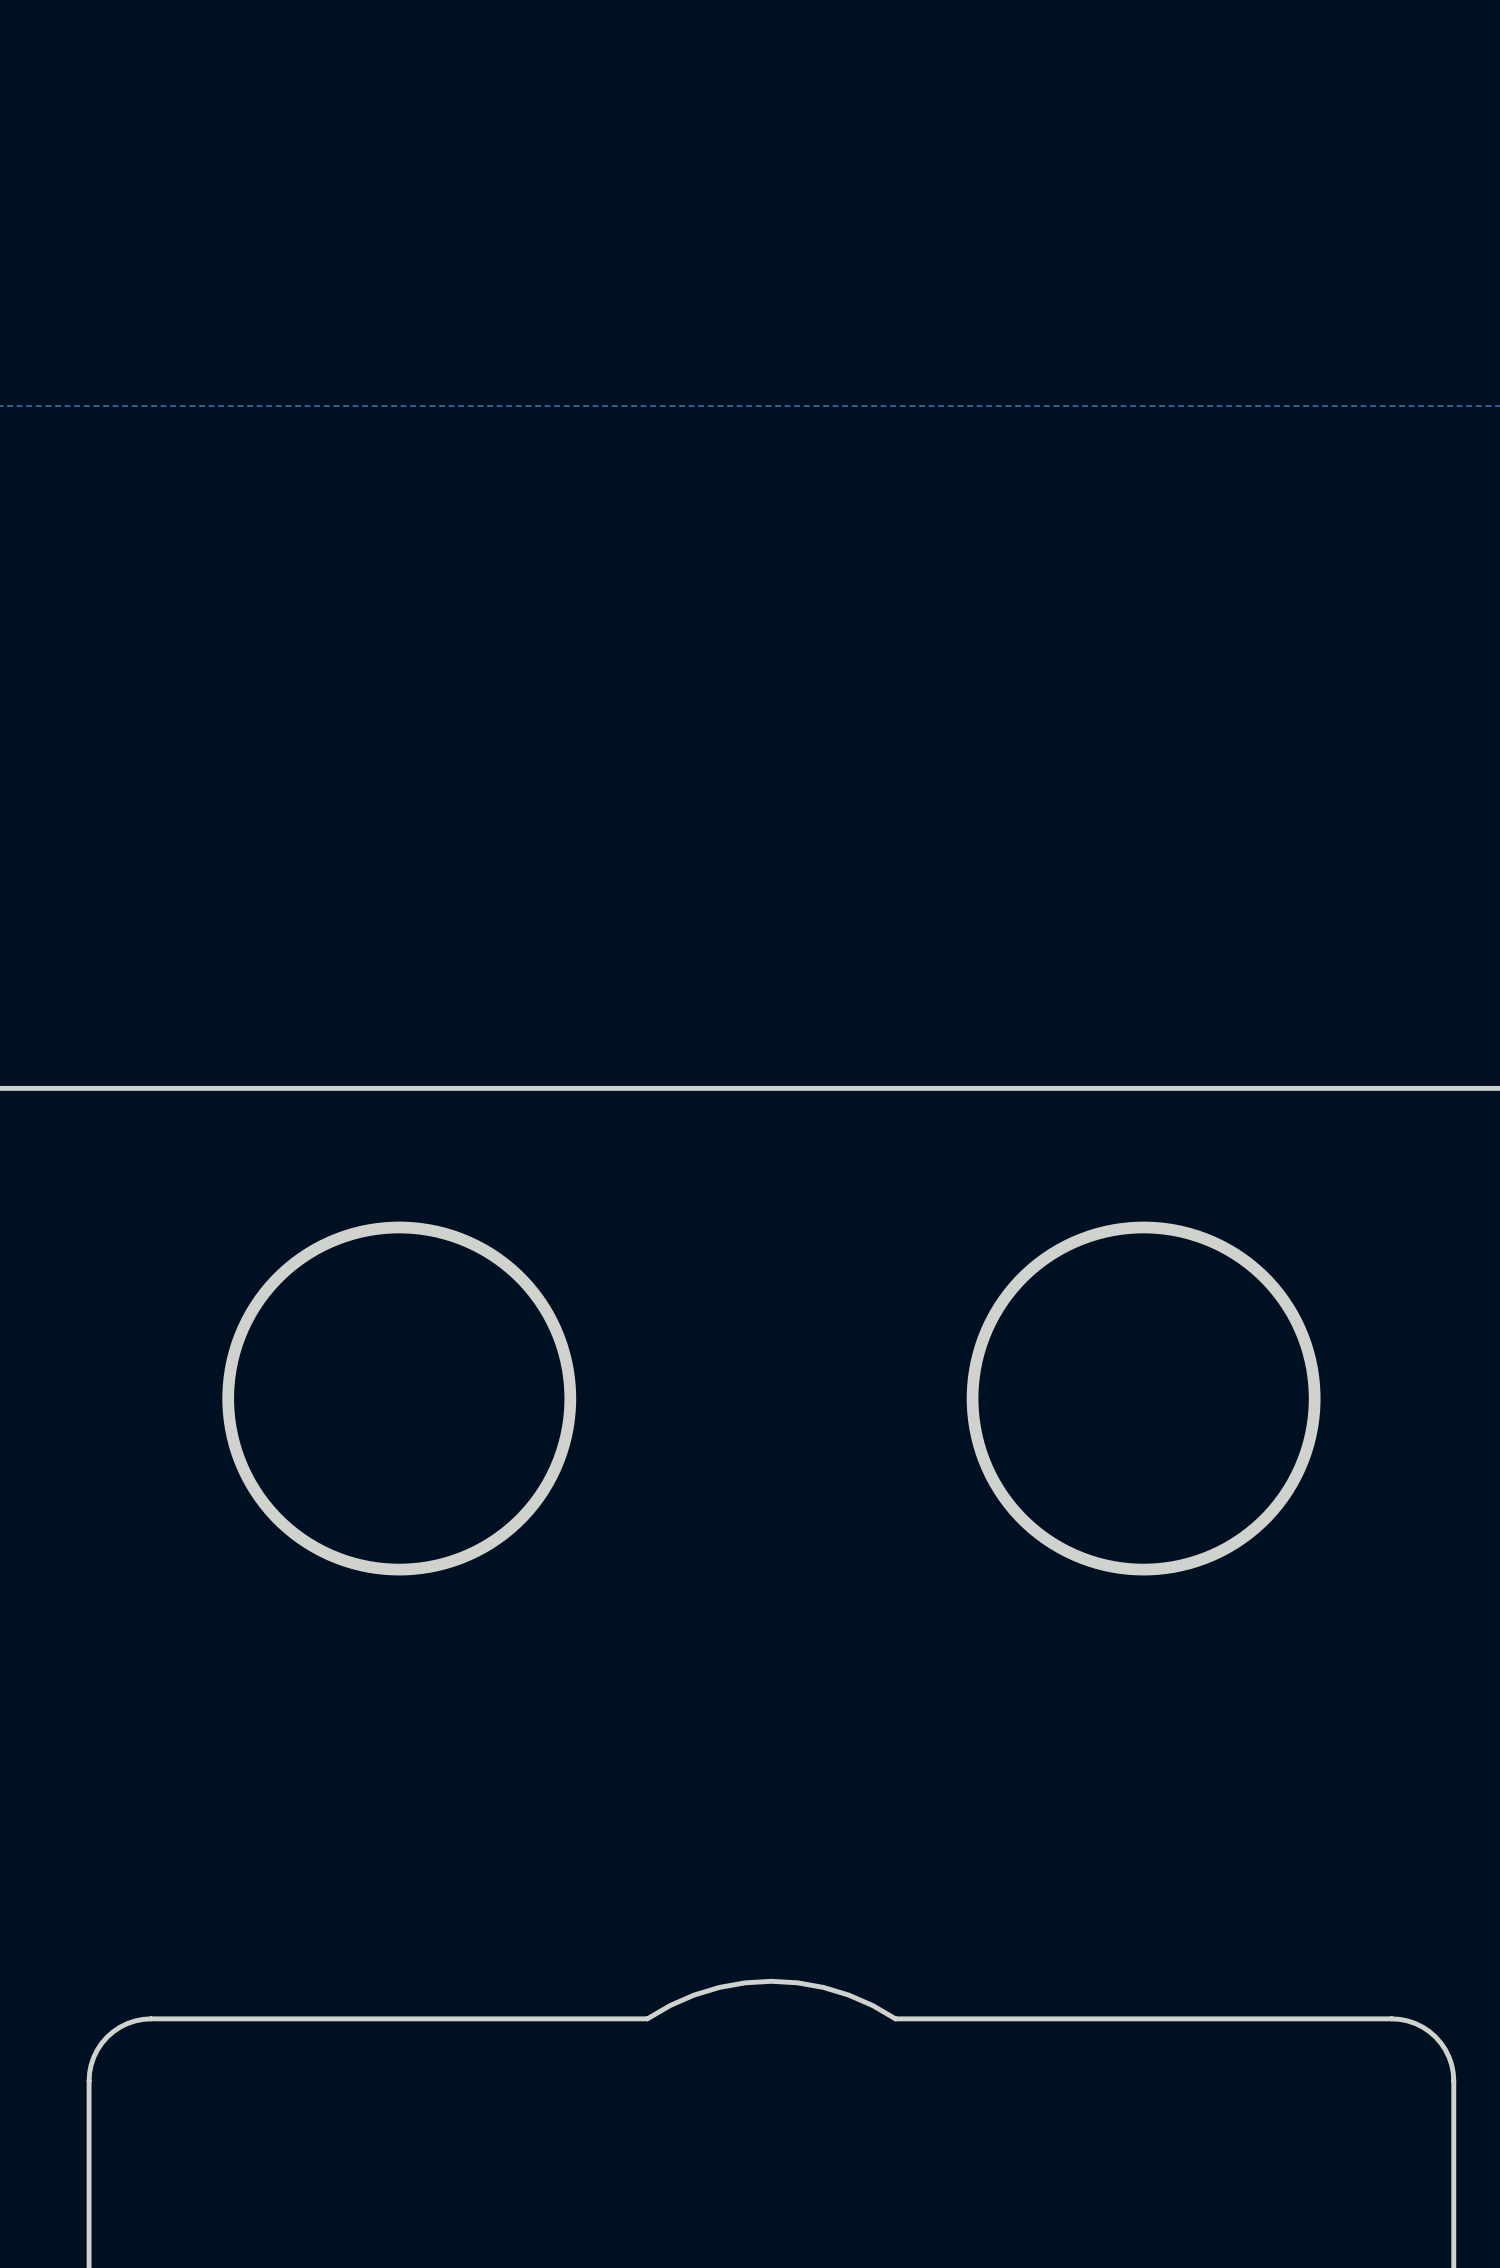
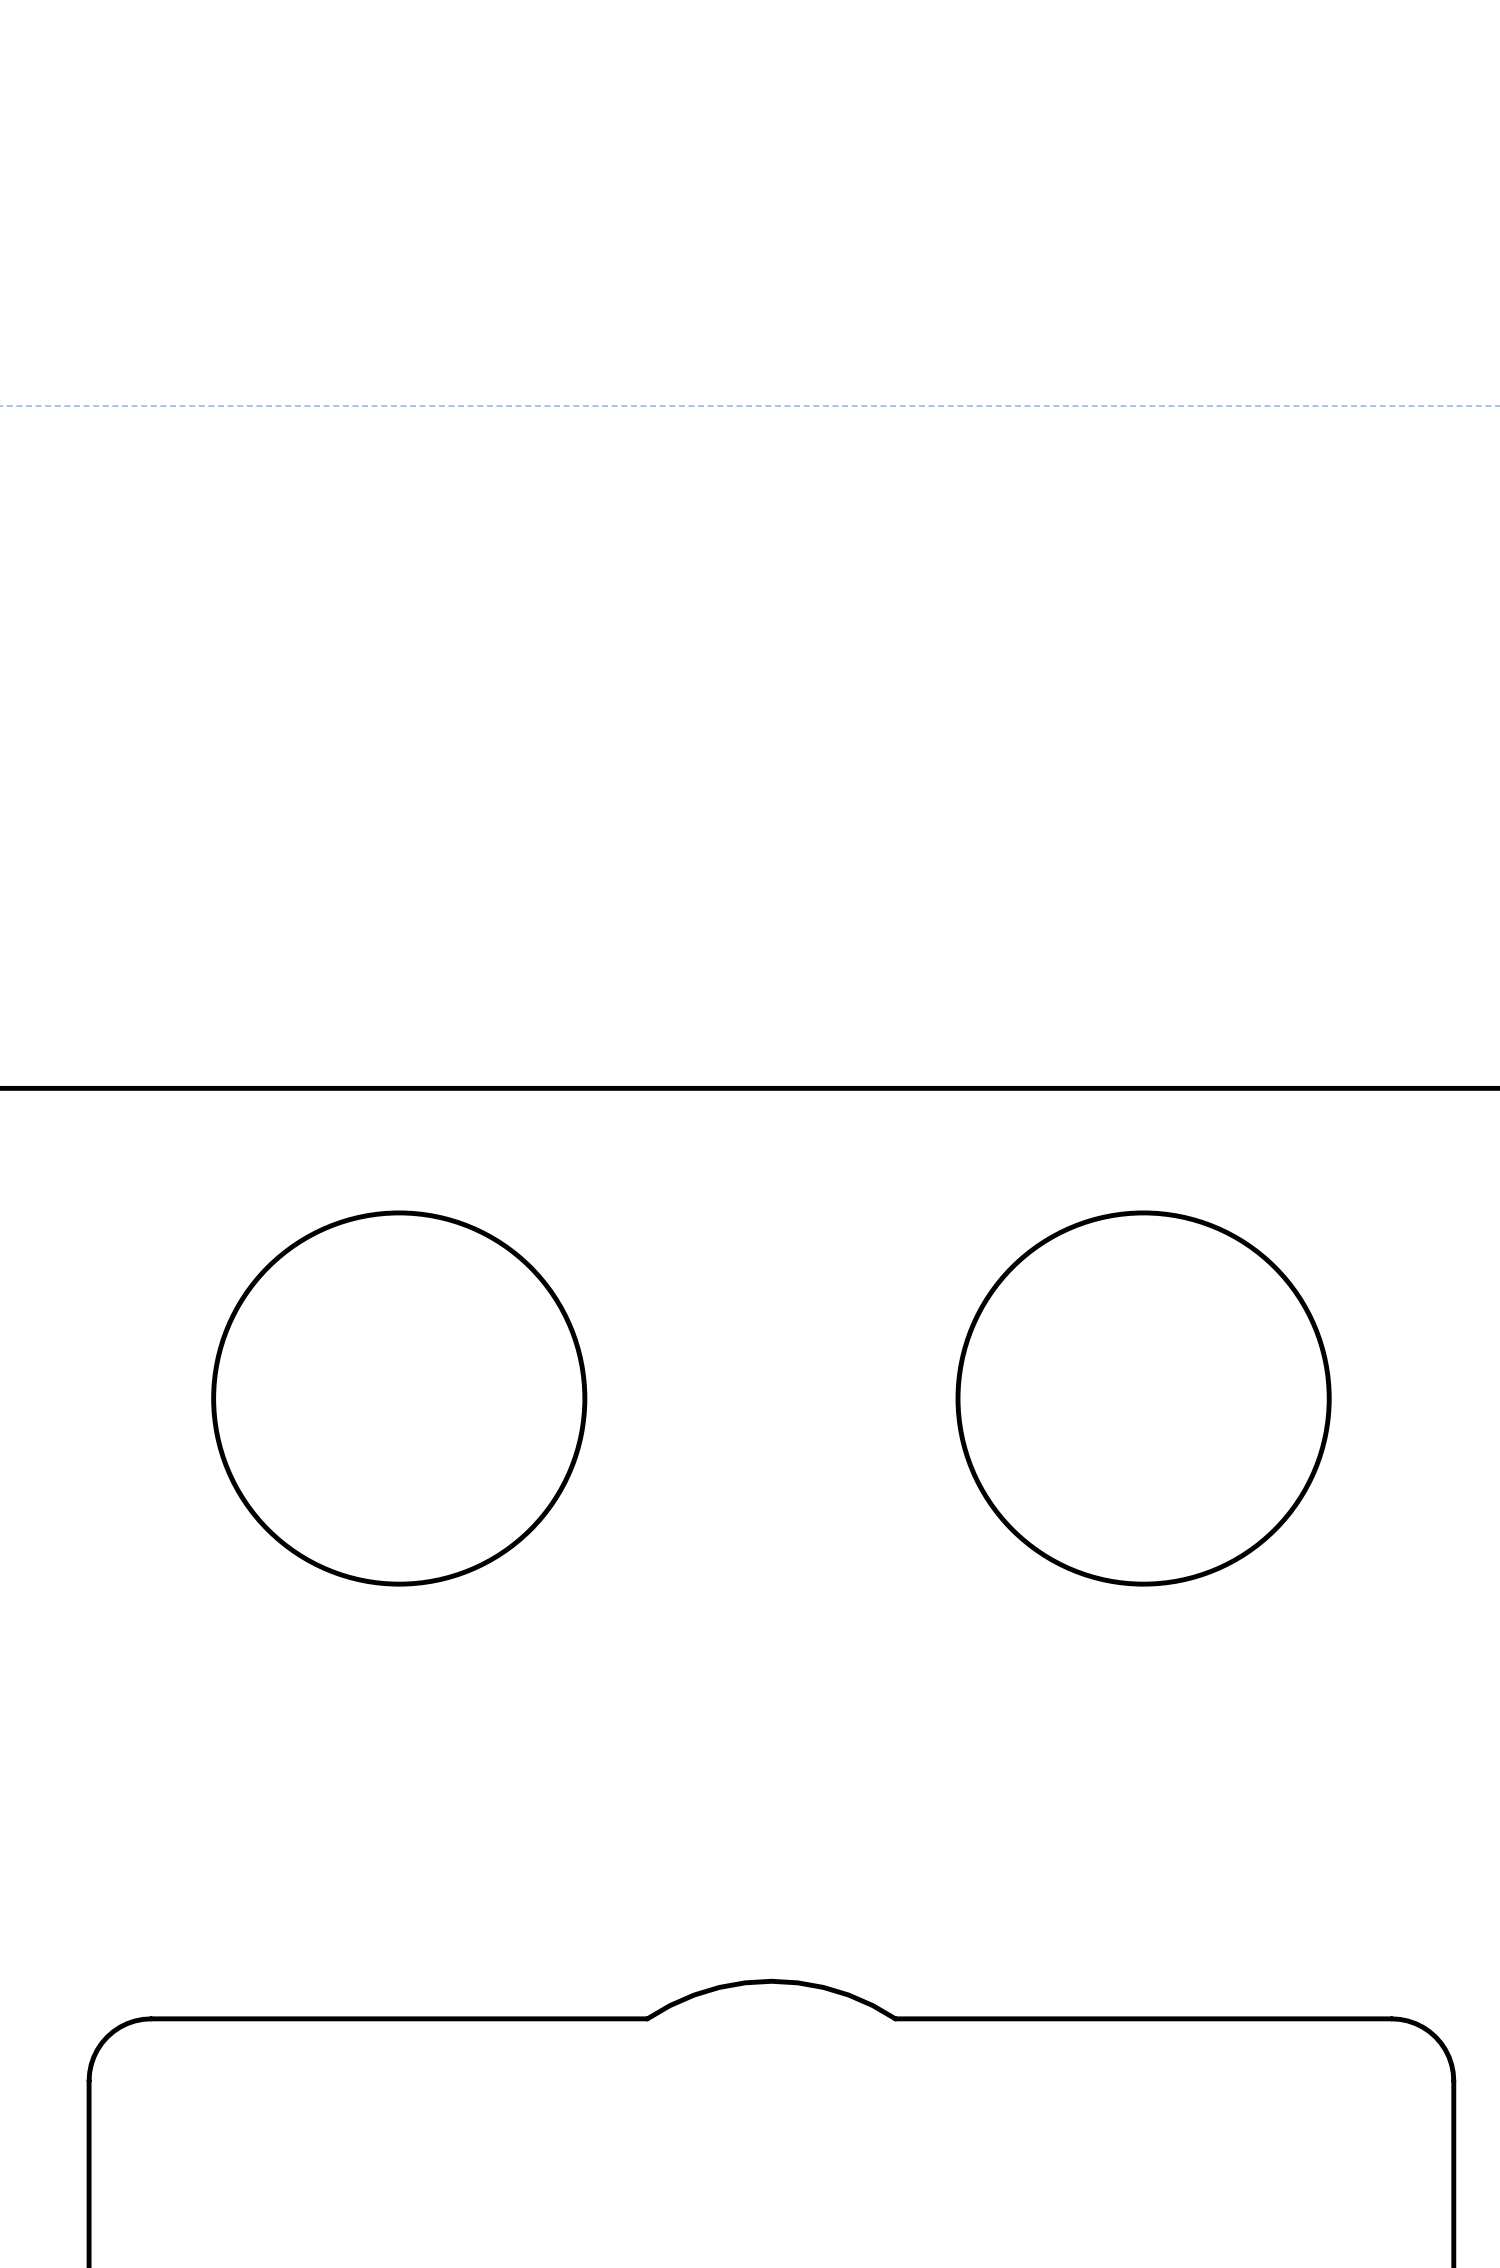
round board edge size: [222, 1221, 577, 1576] -> [211, 1210, 588, 1587]
round board edge size: [966, 1221, 1321, 1576] -> [955, 1210, 1332, 1587]

